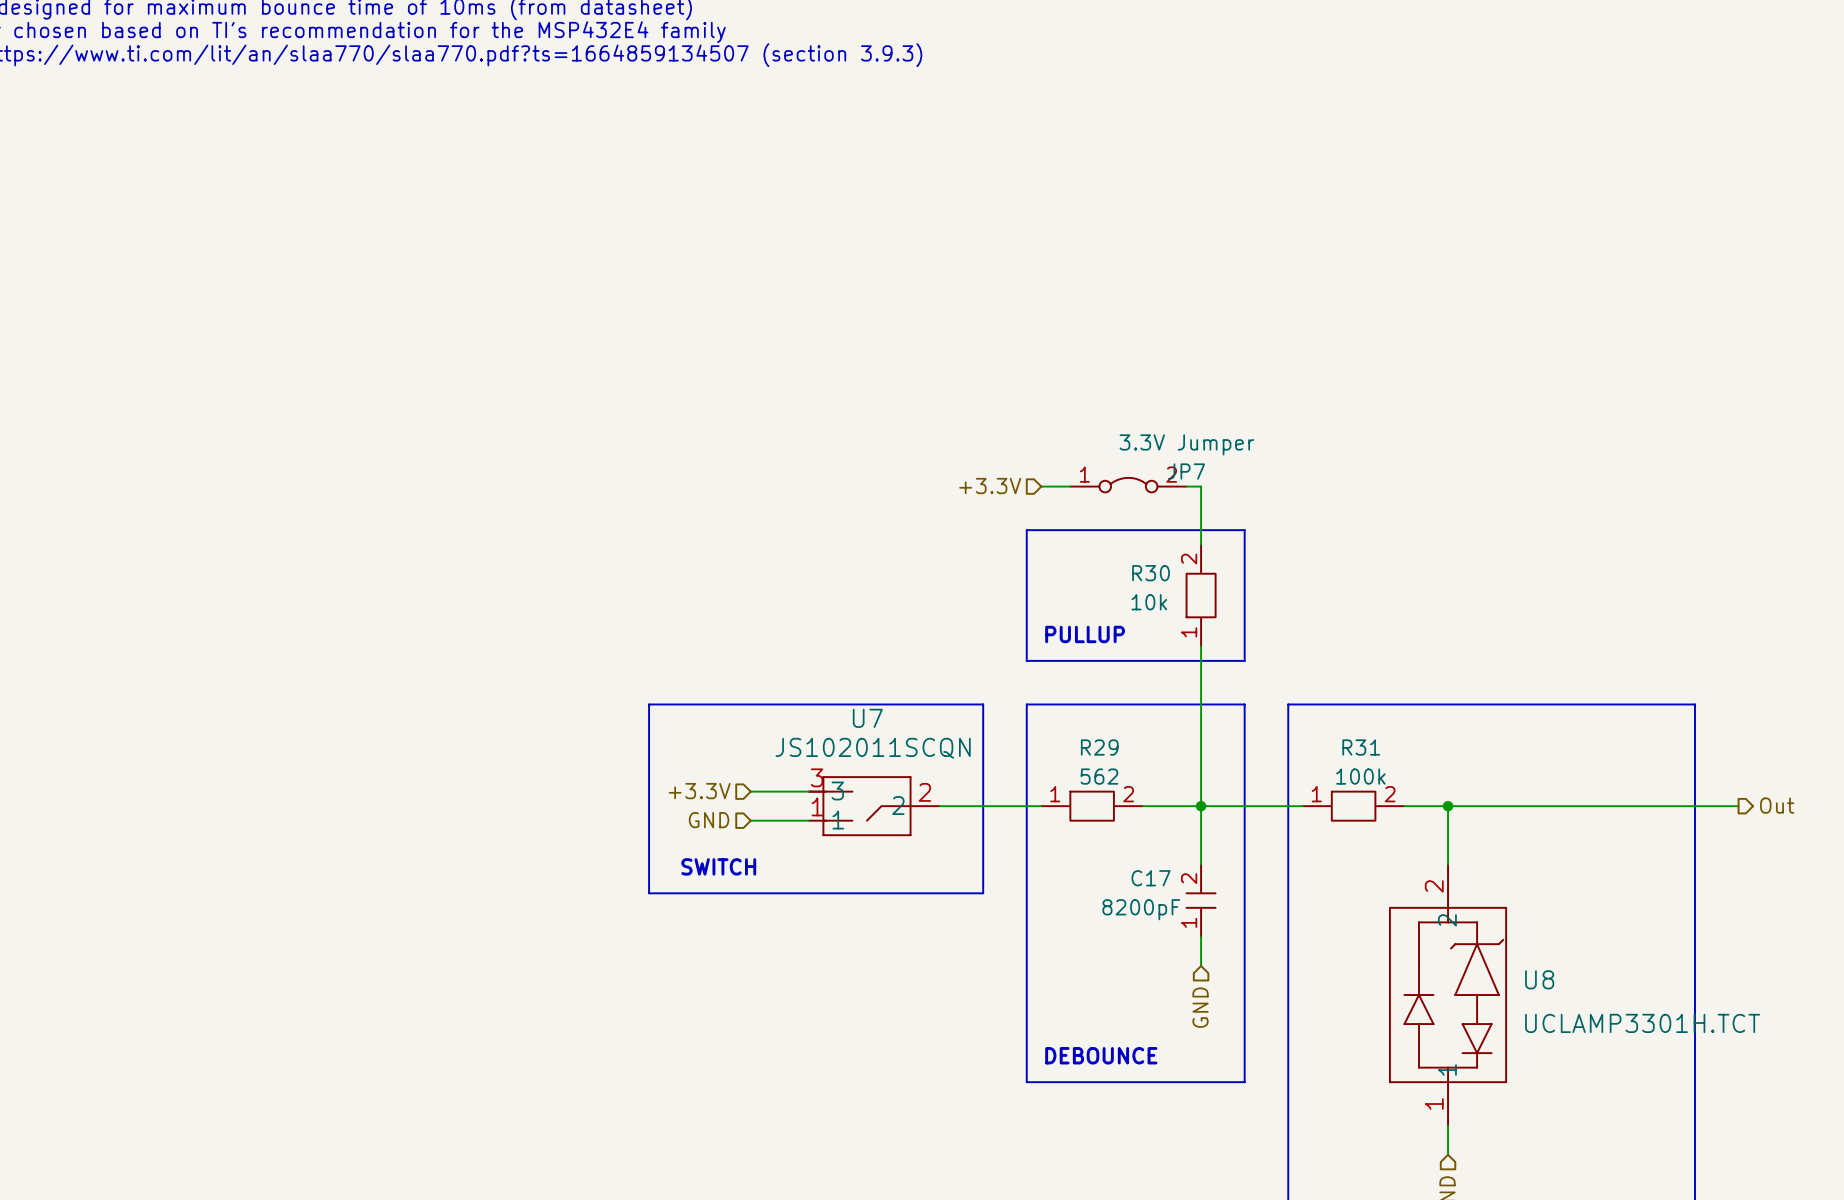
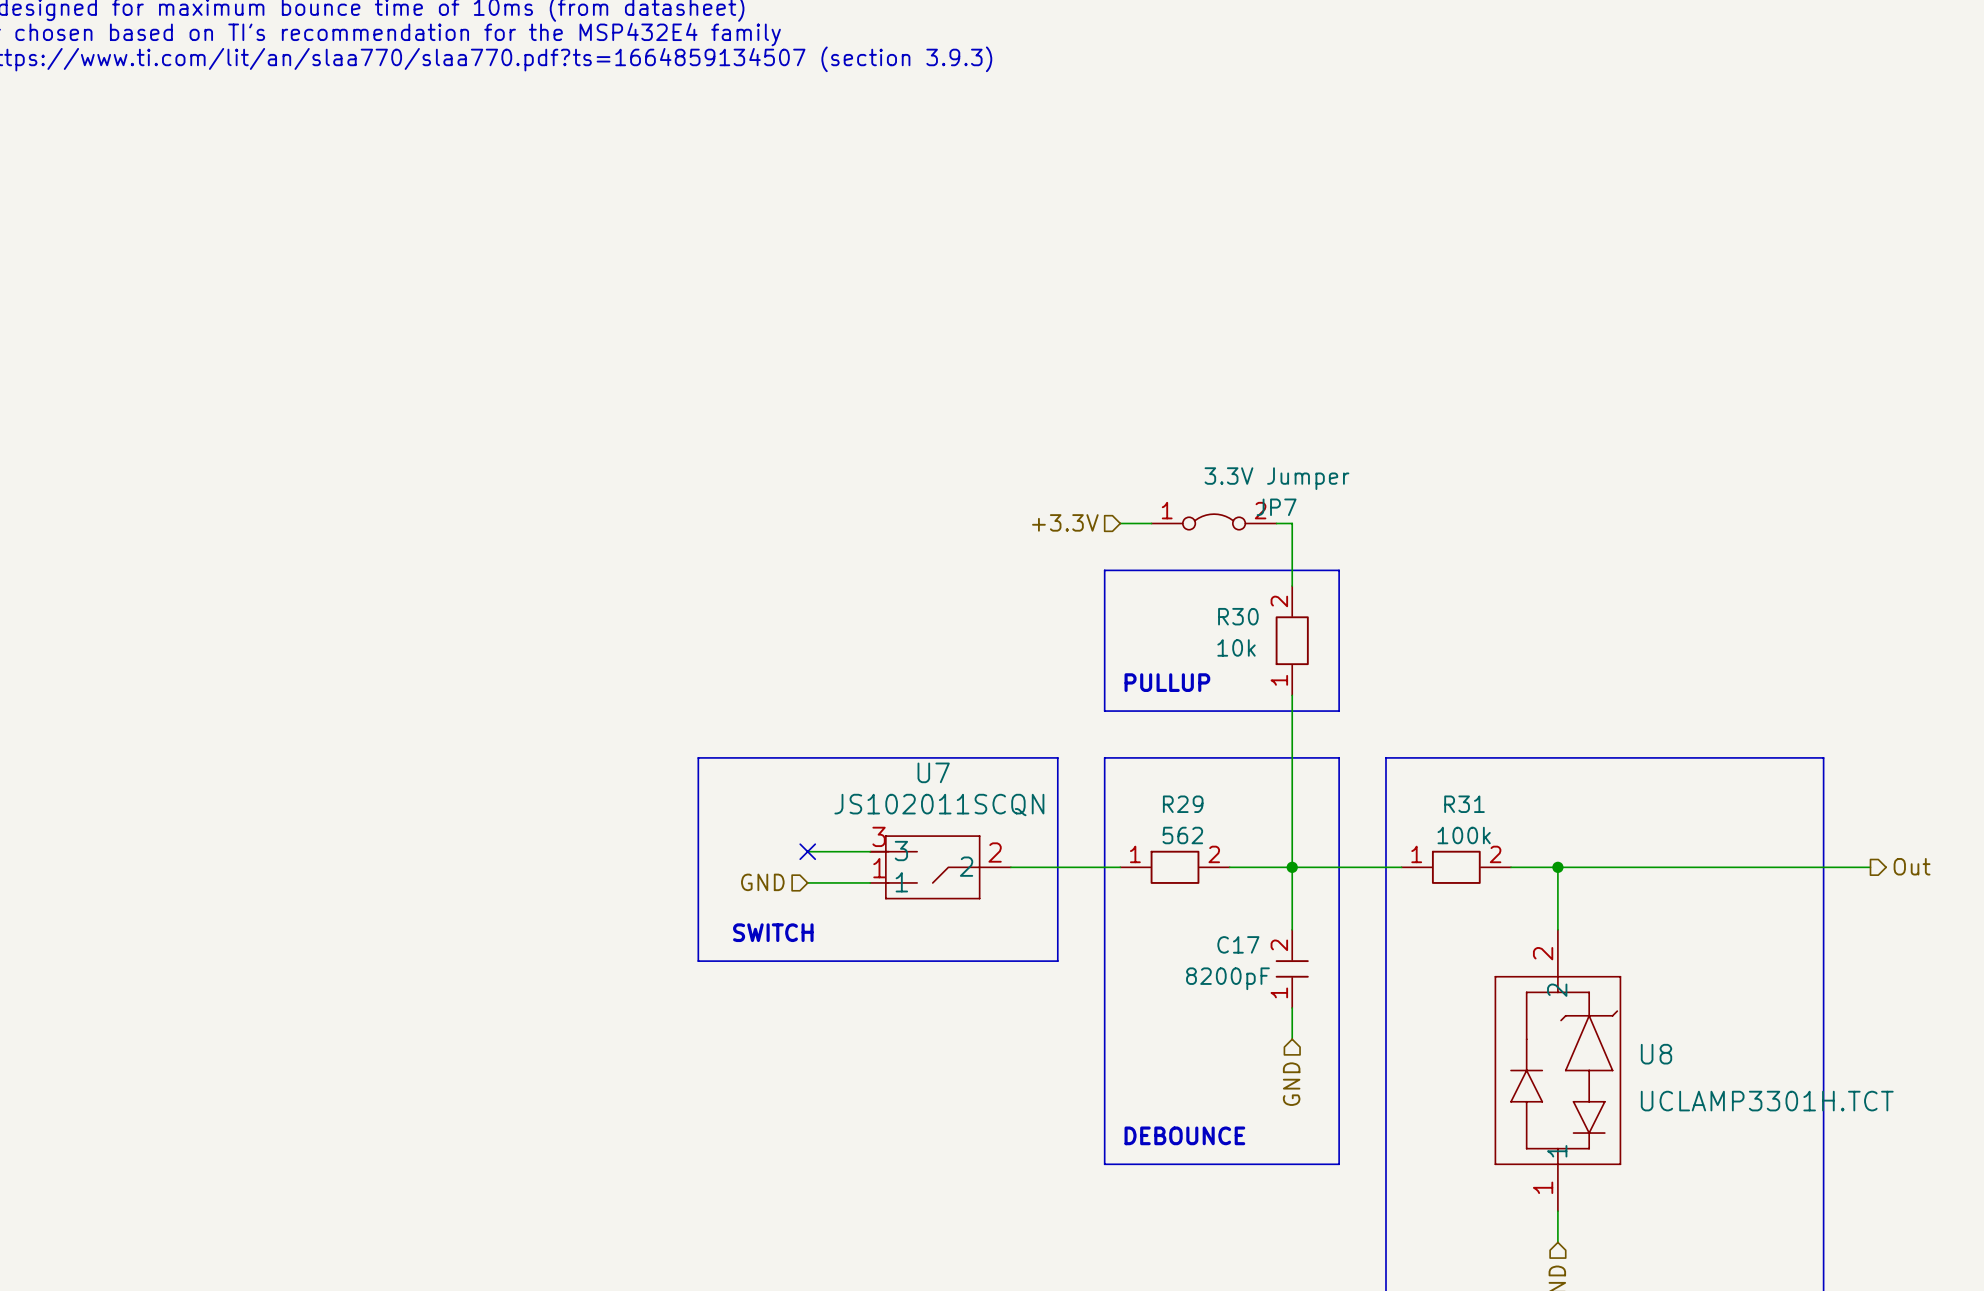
hierarchical label: +3.3V (699, 791) -> none
no-connect mark: none -> (807, 851)

